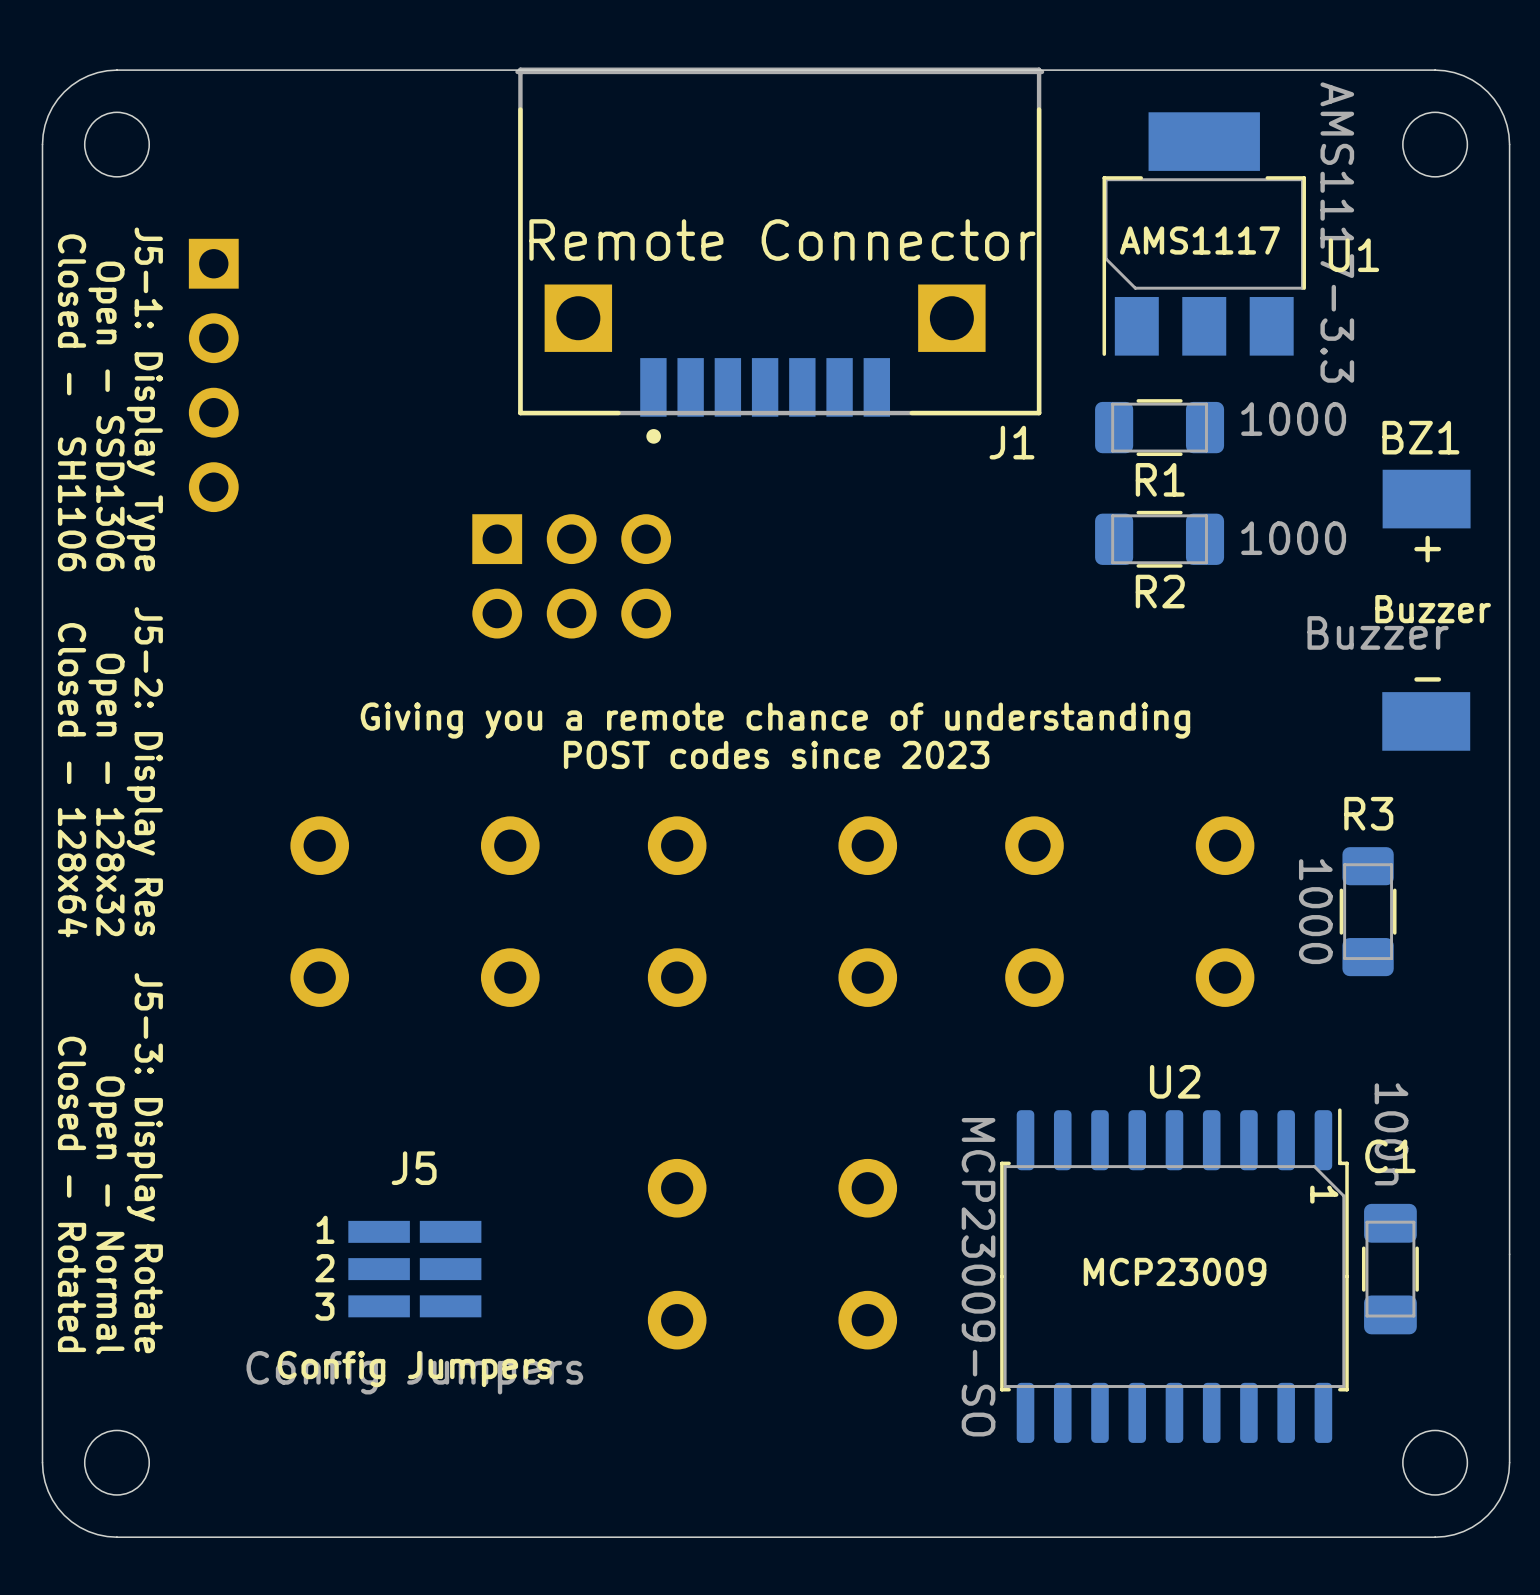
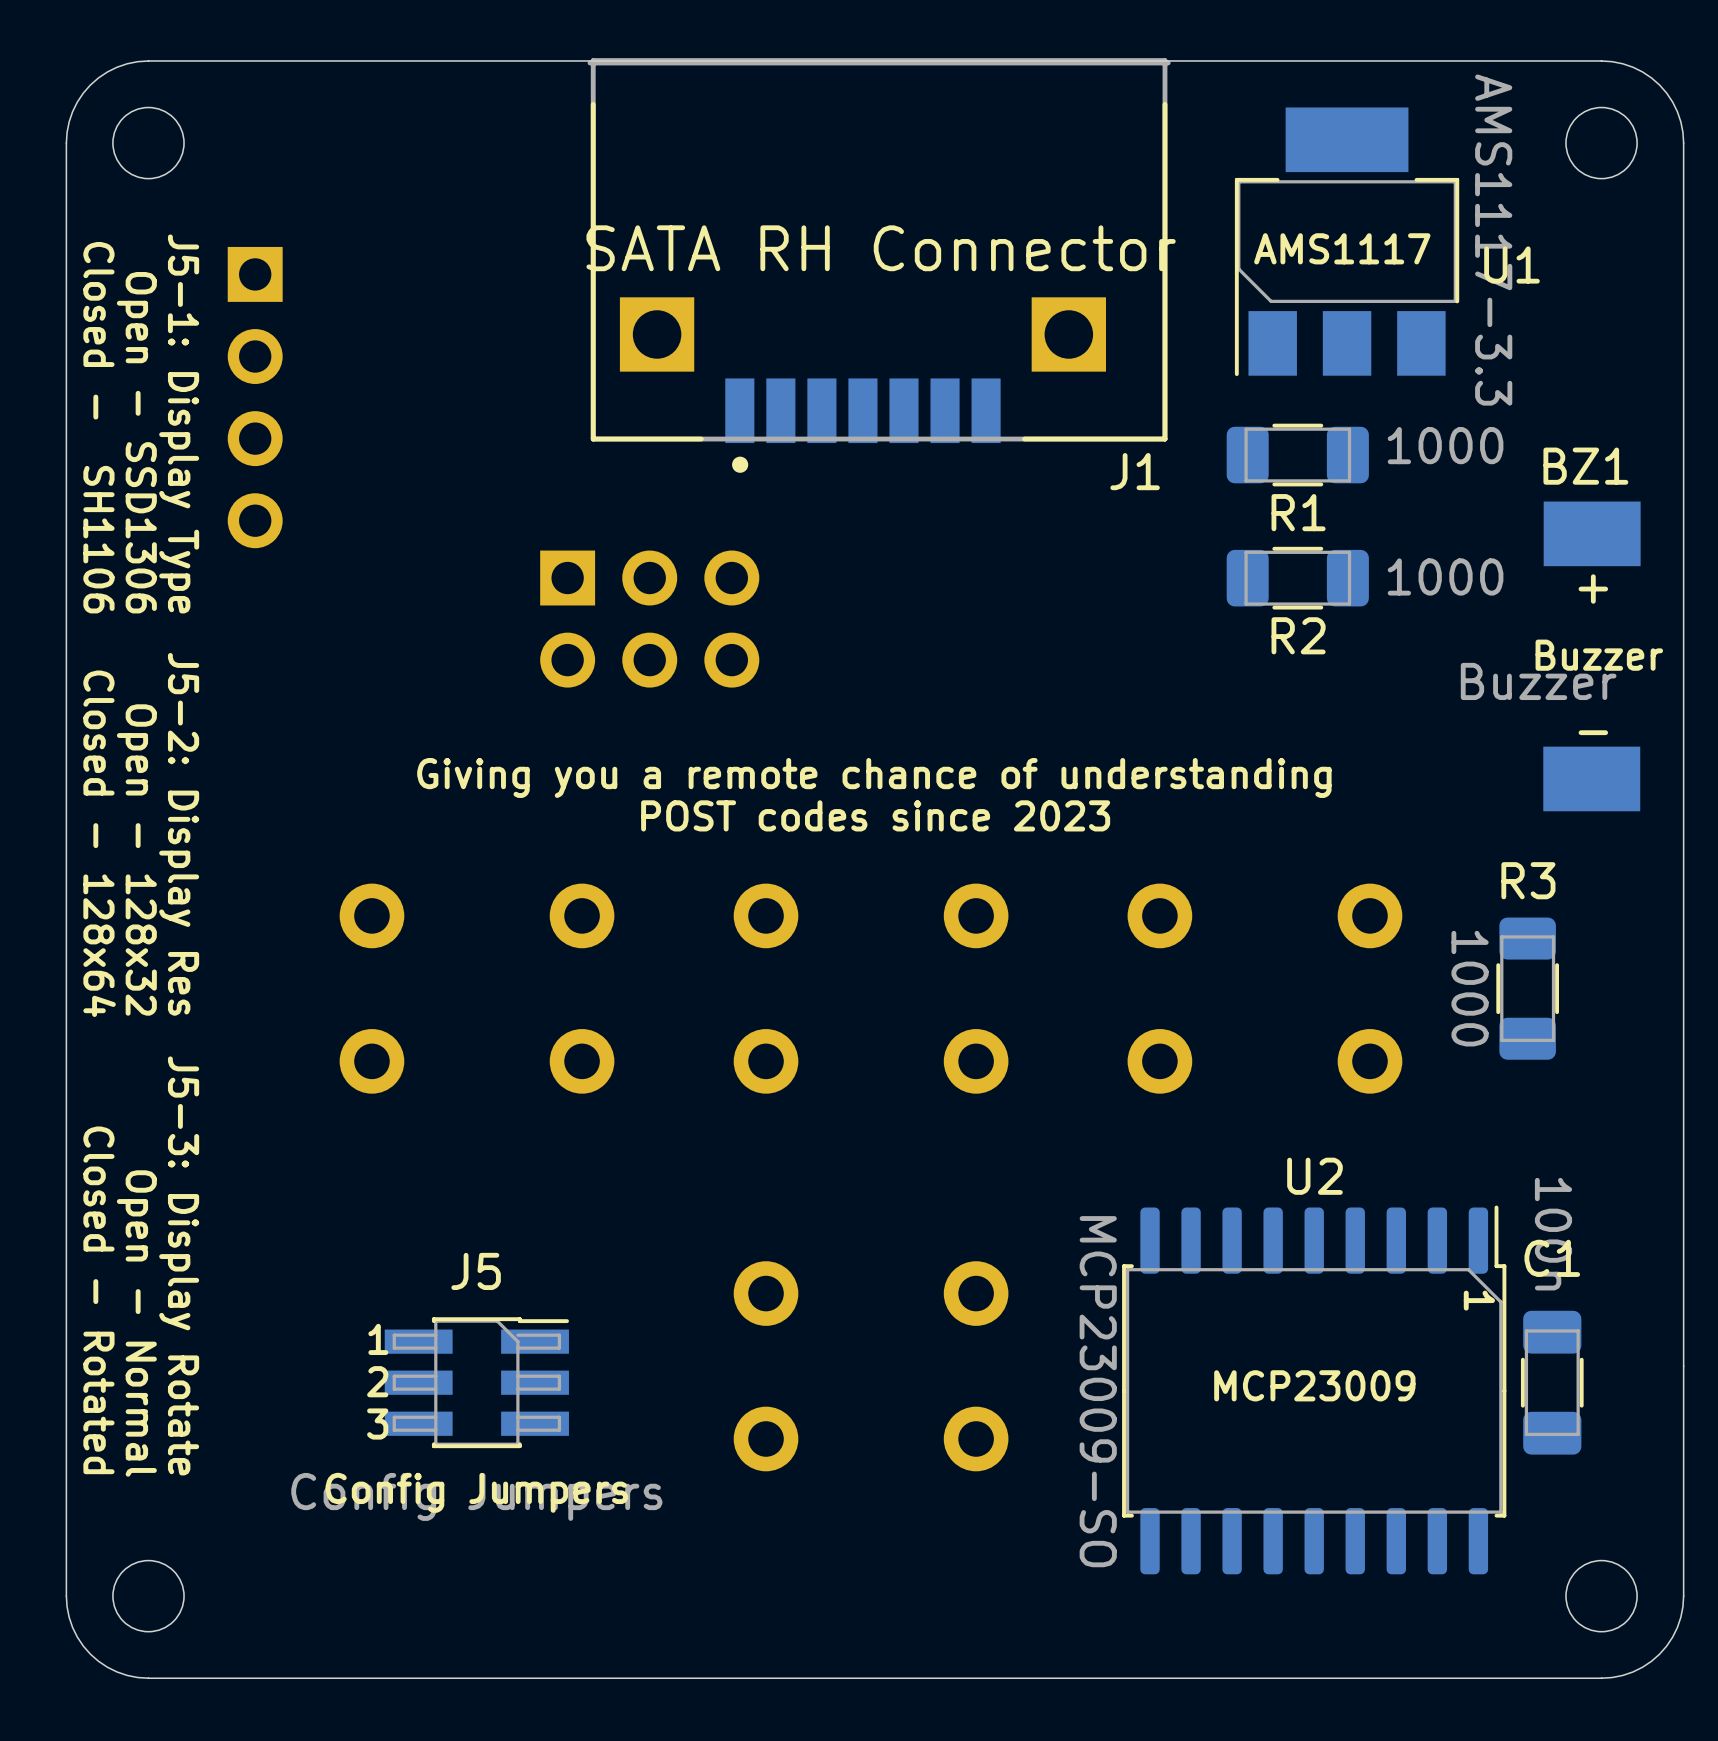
J1 value: Remote Connector (782, 240) -> SATA RH Connector (881, 248)
J5 footprint: [348, 1220, 482, 1318] -> [384, 1317, 569, 1449]

